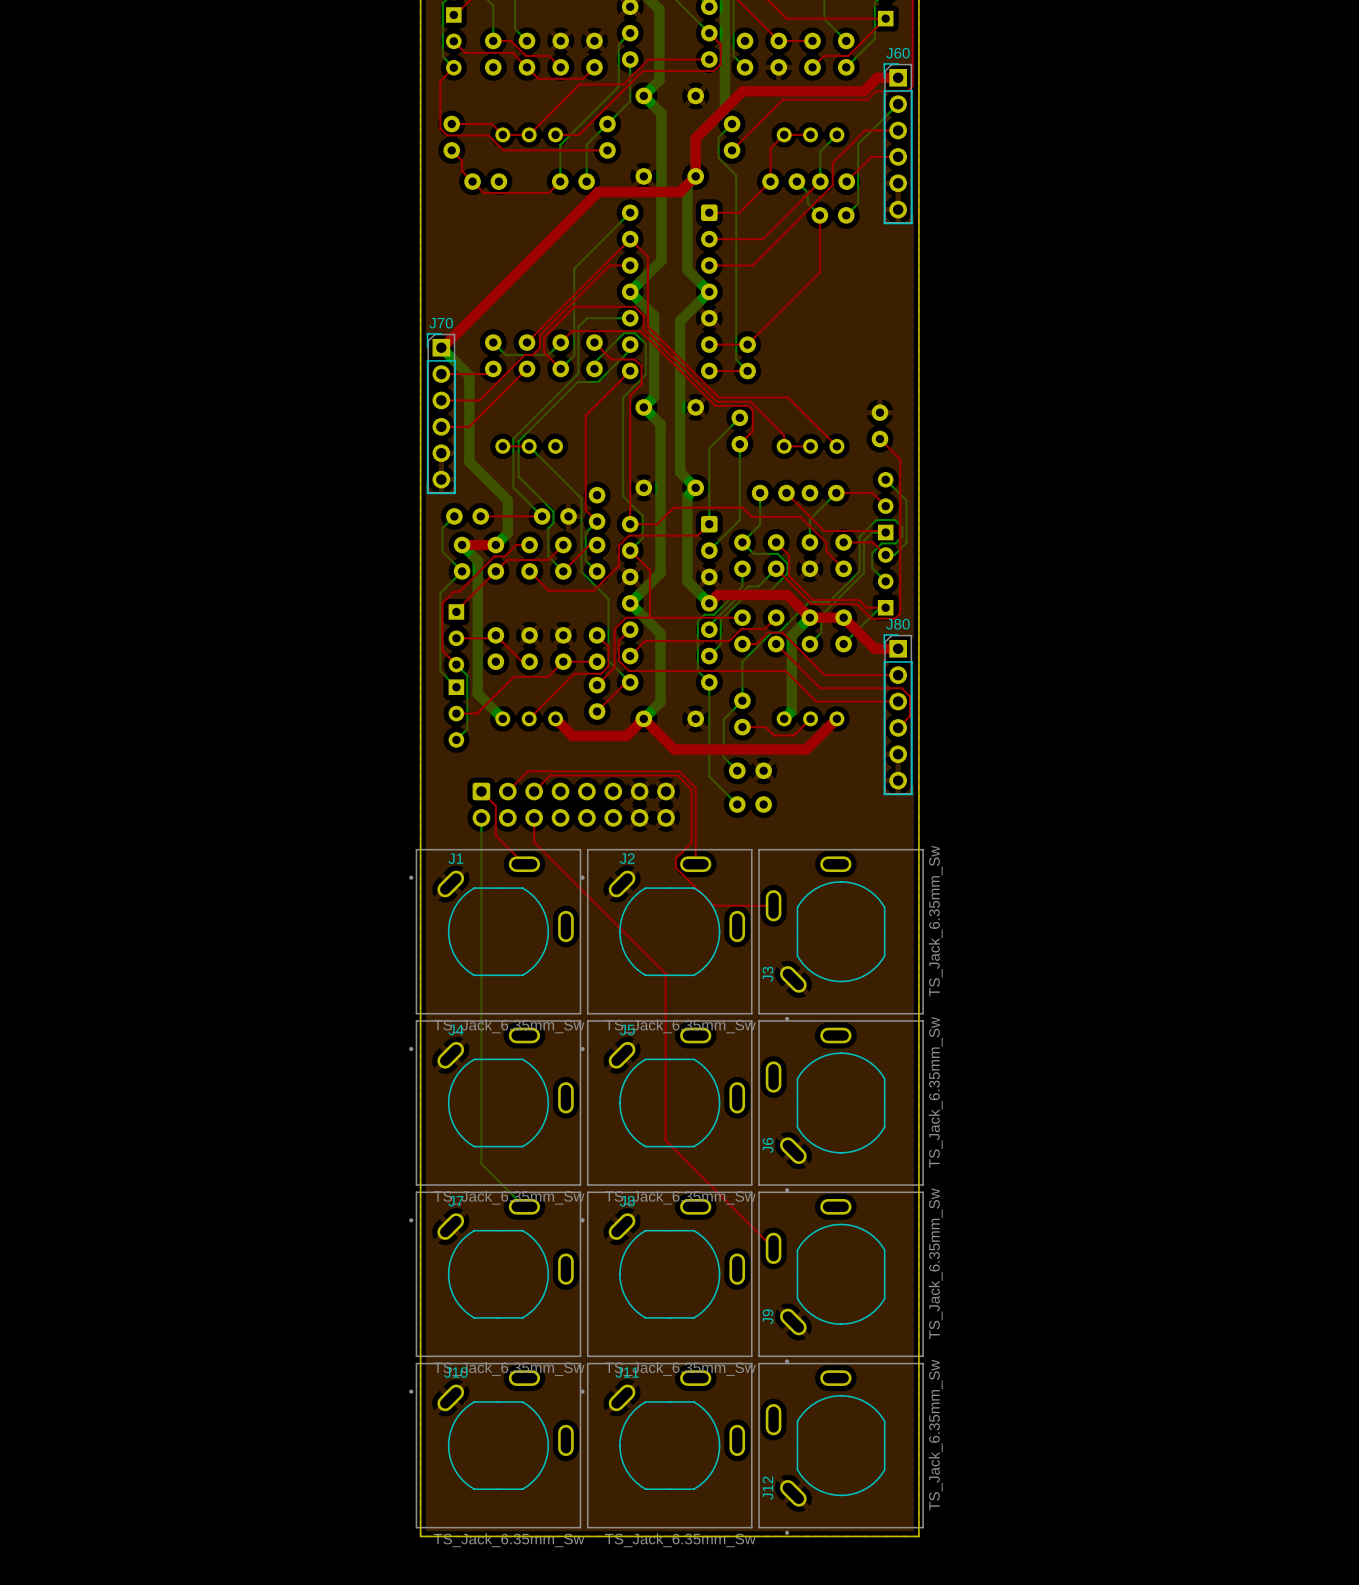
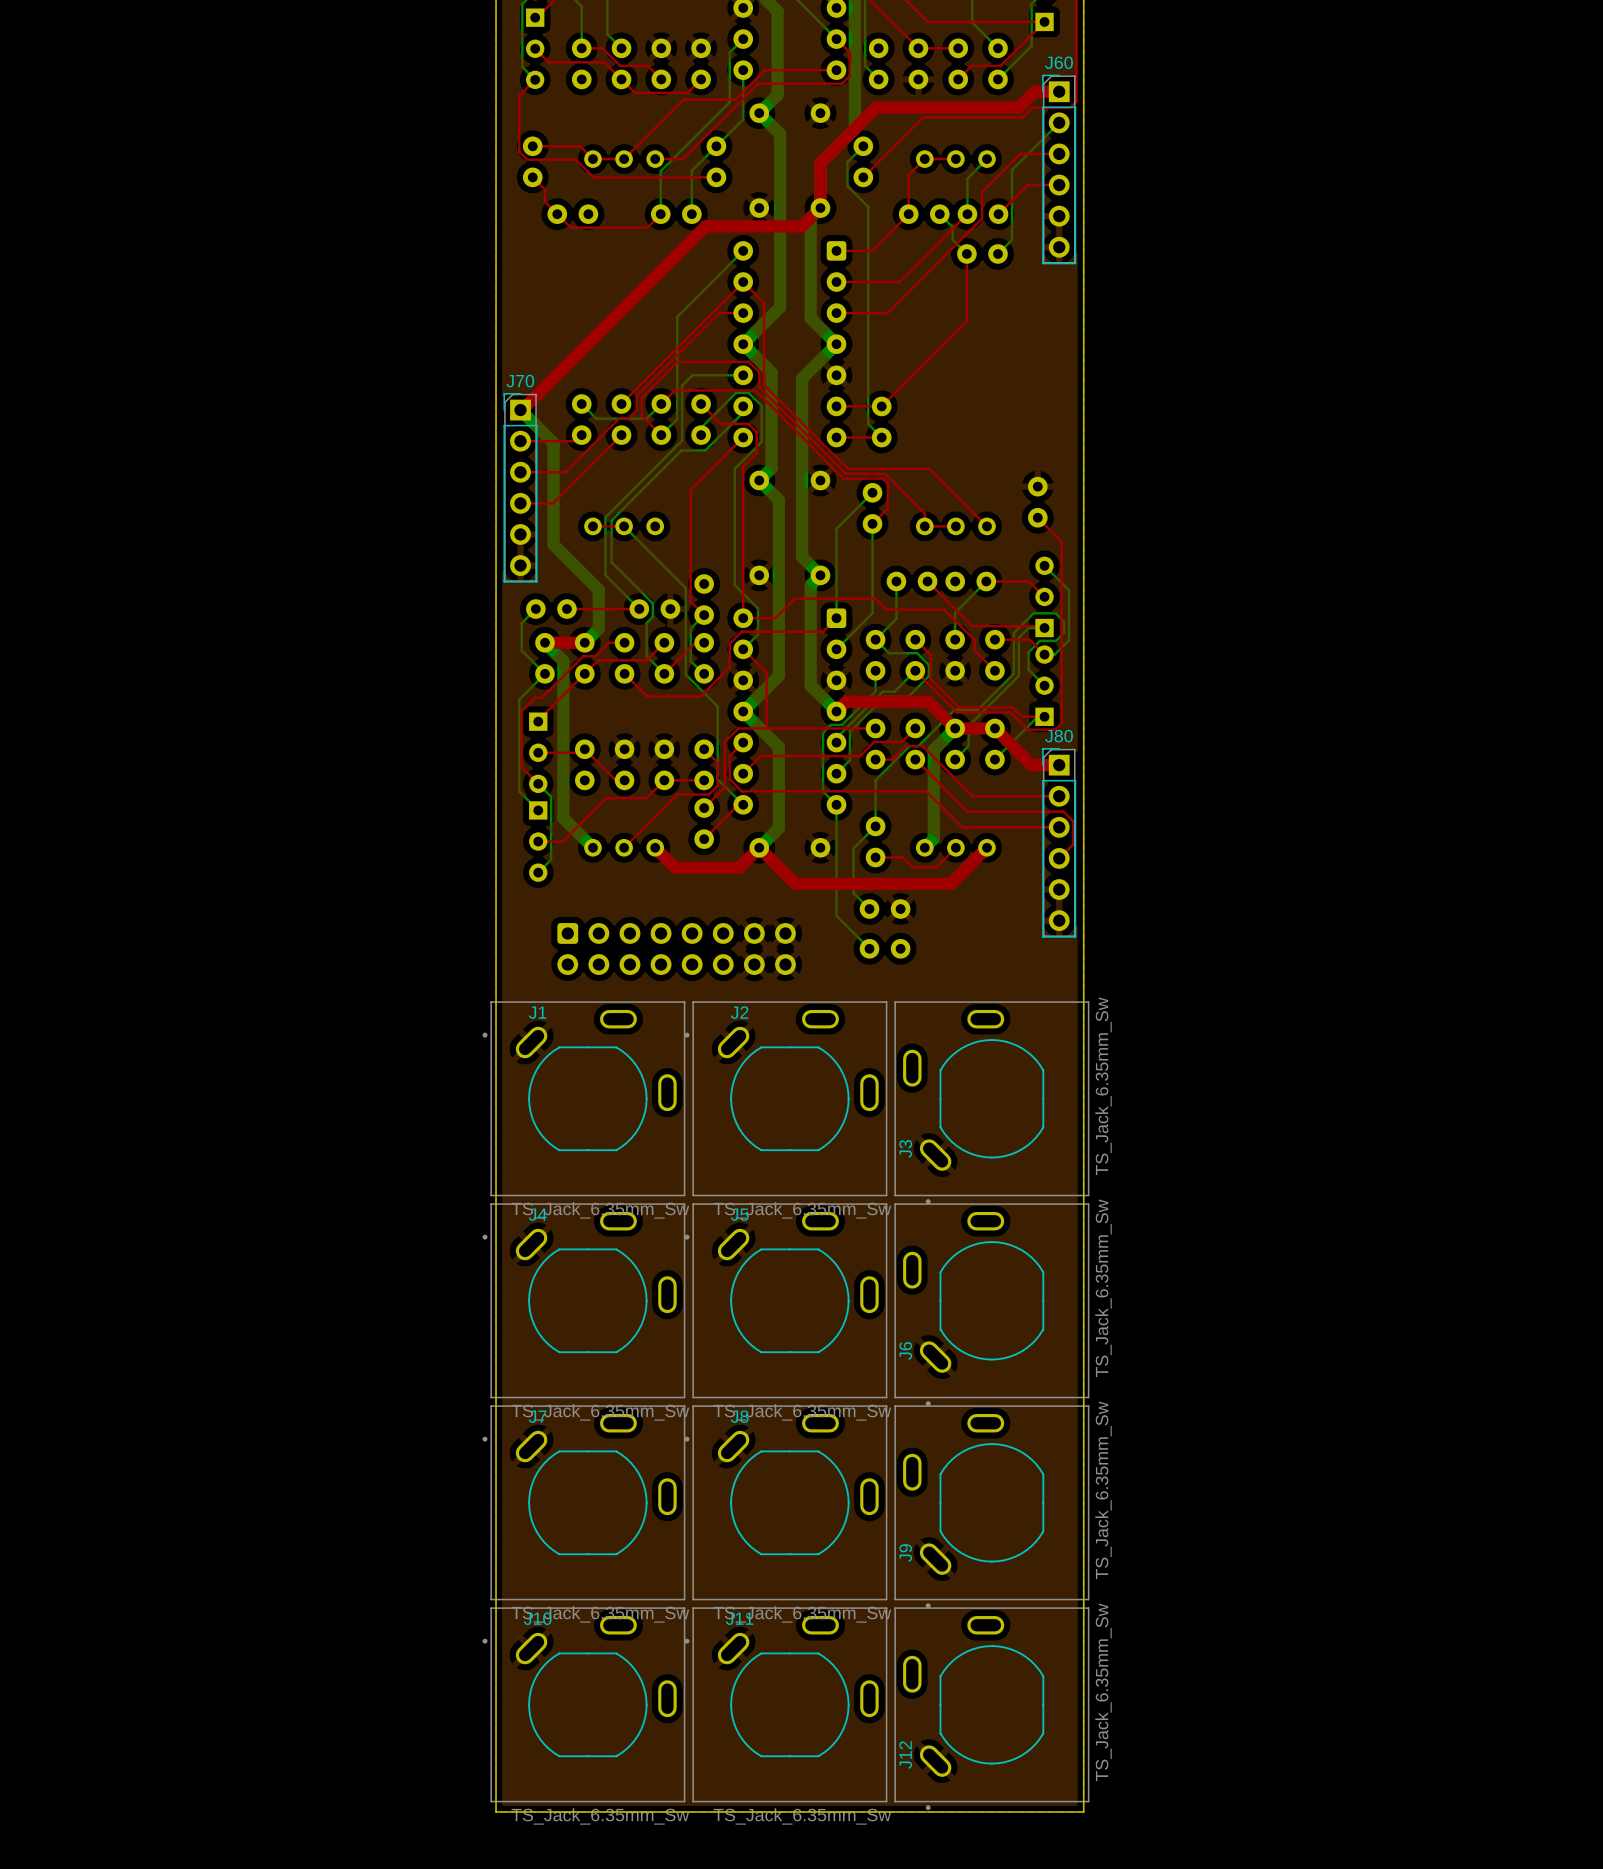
top track: (481, 791) (495, 805) (495, 835) (524, 864) -> none
top track: (507, 791) (528, 771) (679, 771) (695, 787) (695, 864) -> none
top track: (534, 791) (550, 775) (677, 775) (691, 789) (691, 842) (675, 858) (675, 867) (713, 905) (773, 905) -> none
bottom track: (481, 817) (481, 1163) (524, 1206) -> none
top track: (534, 817) (534, 842) (665, 973) (665, 1140) (773, 1248) -> none

